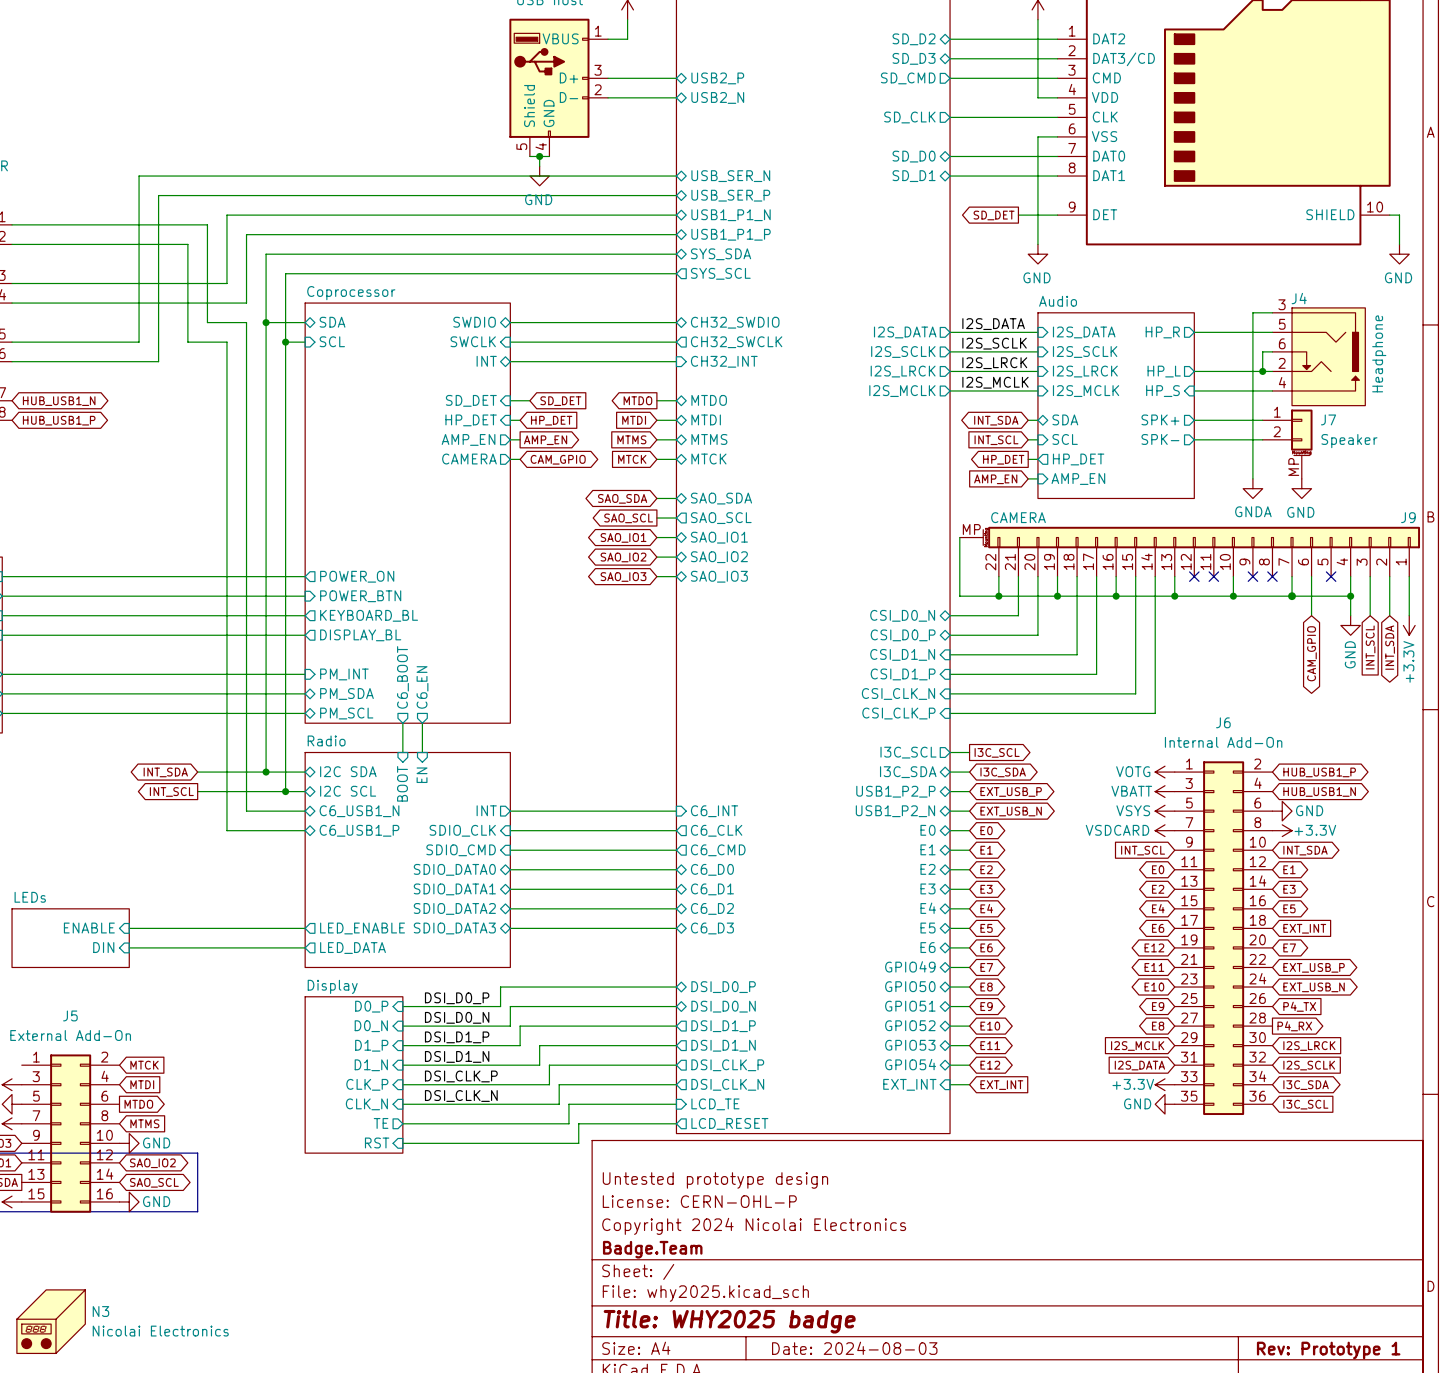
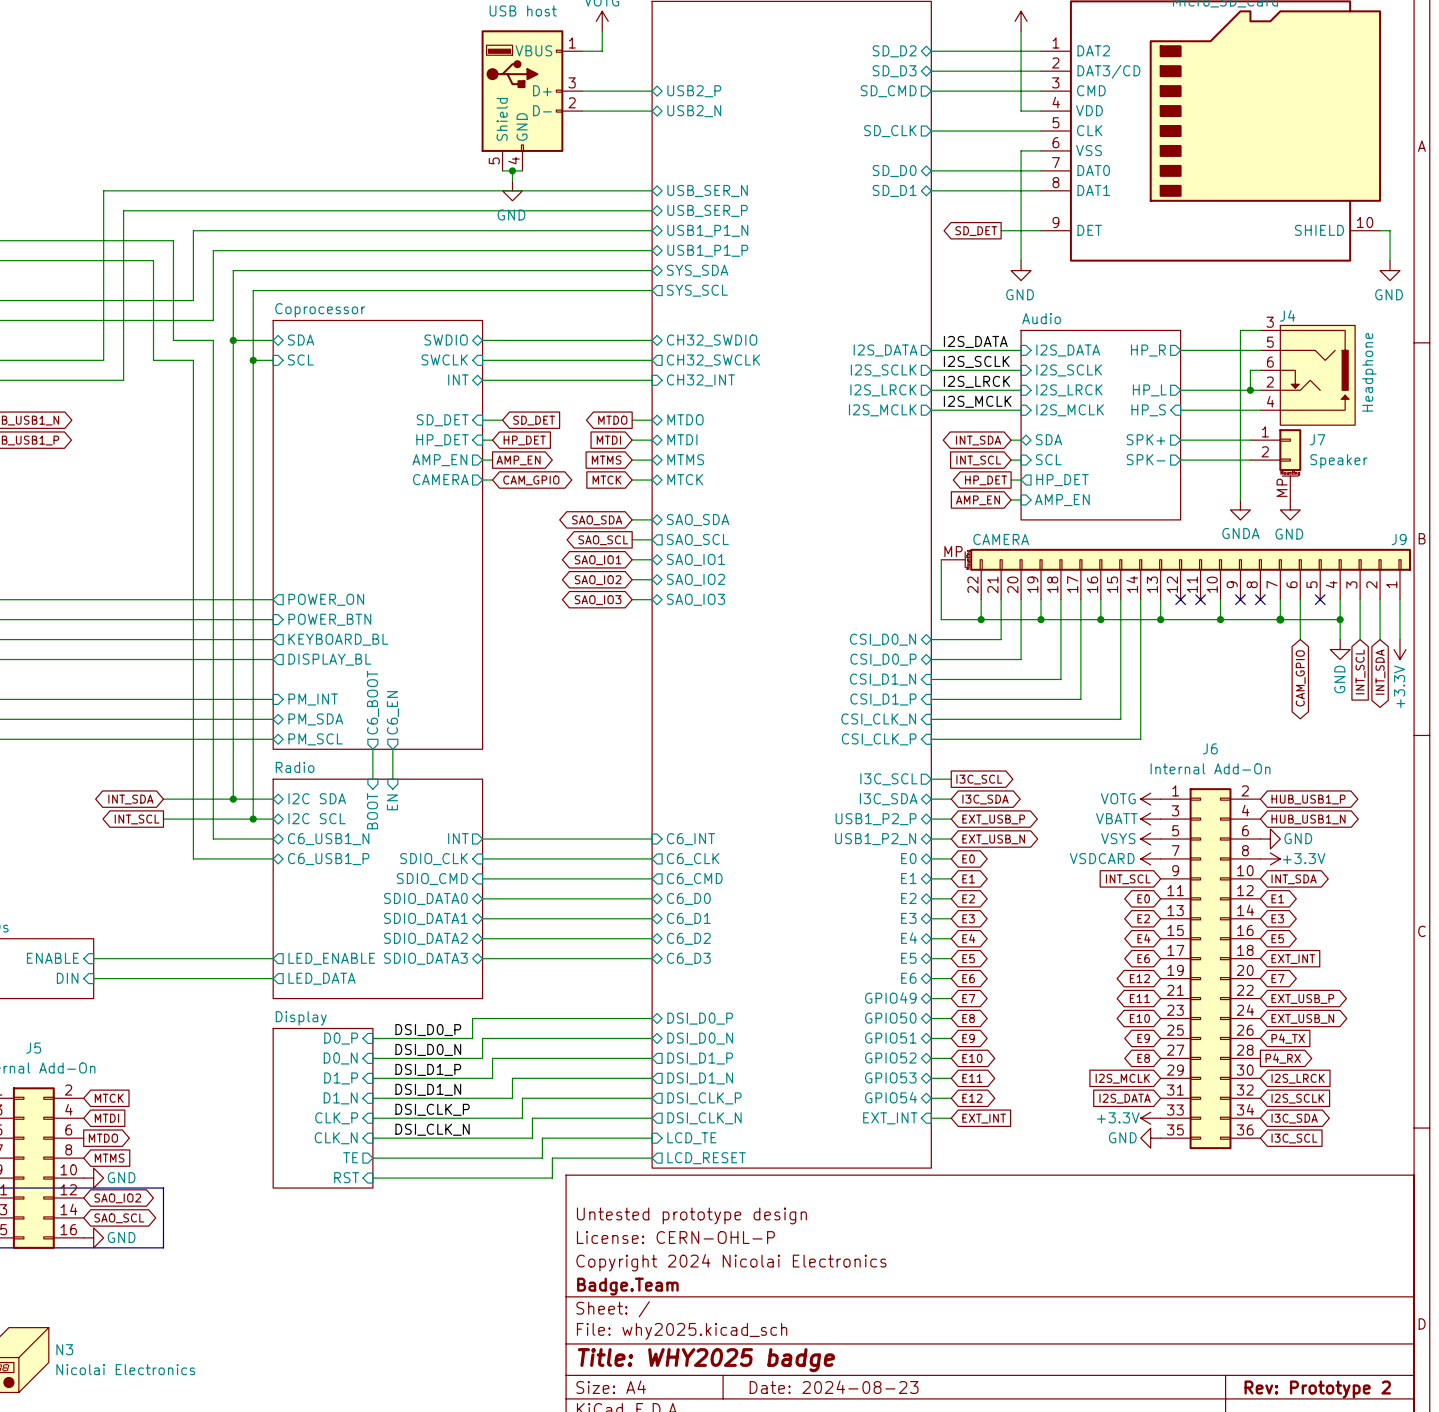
title block: Date: 2024-08-03 (854, 1348) -> Date: 2024-08-23 (834, 1387)
title block: Rev: Prototype 1 (1328, 1350) -> Rev: Prototype 2 (1317, 1389)

